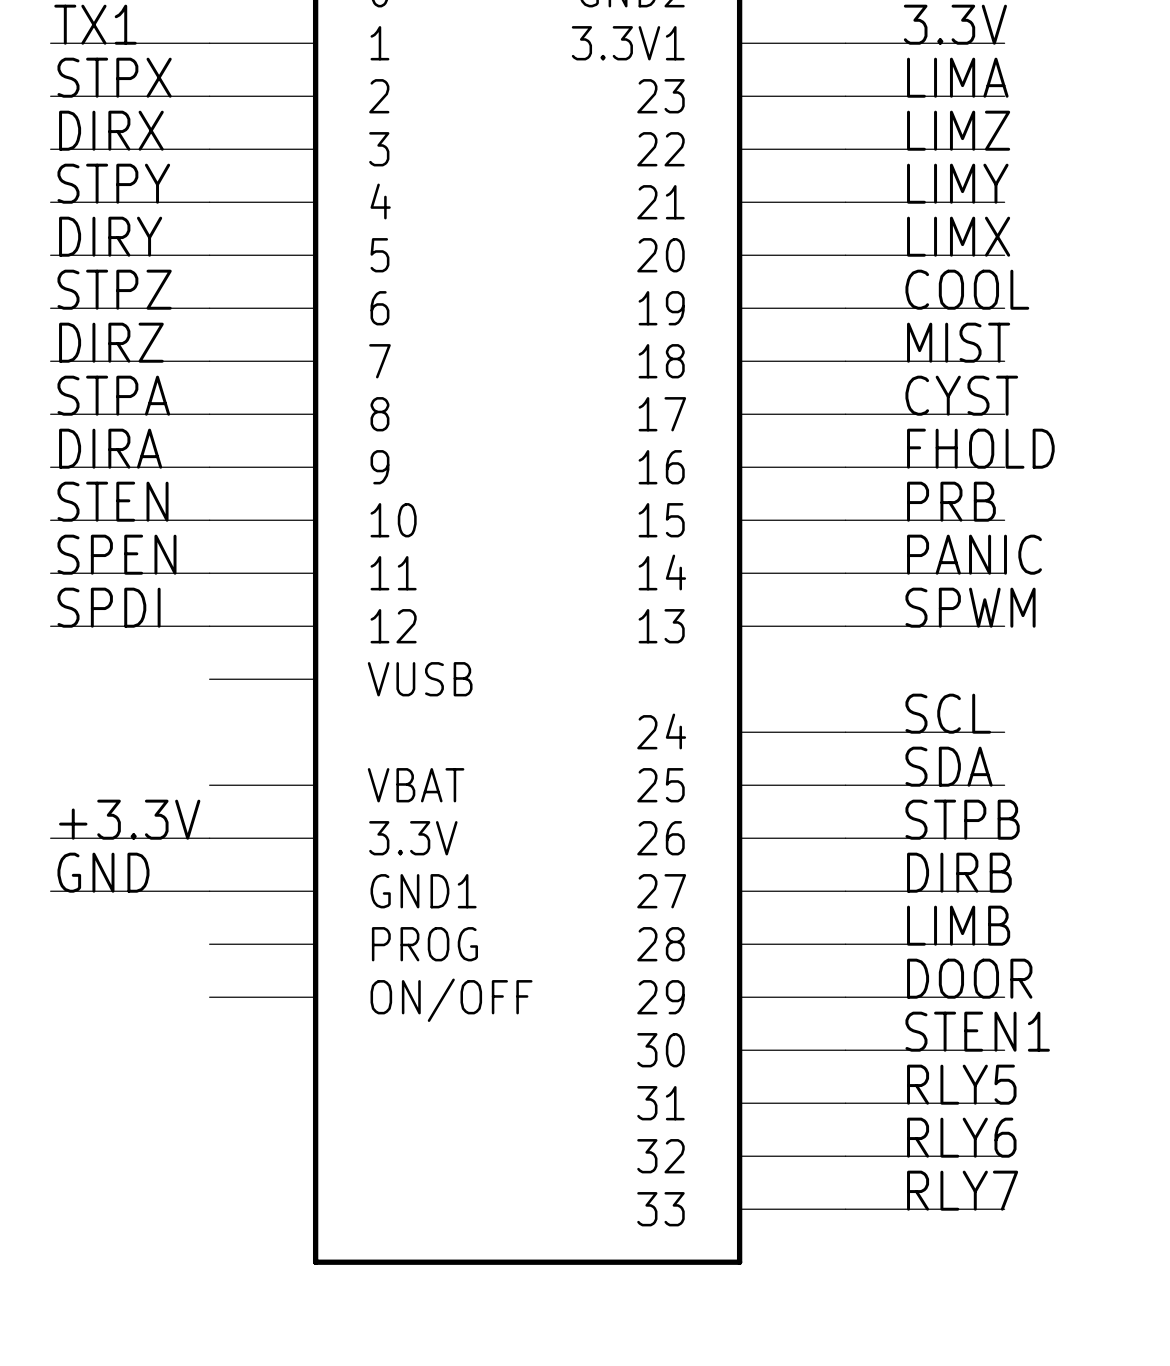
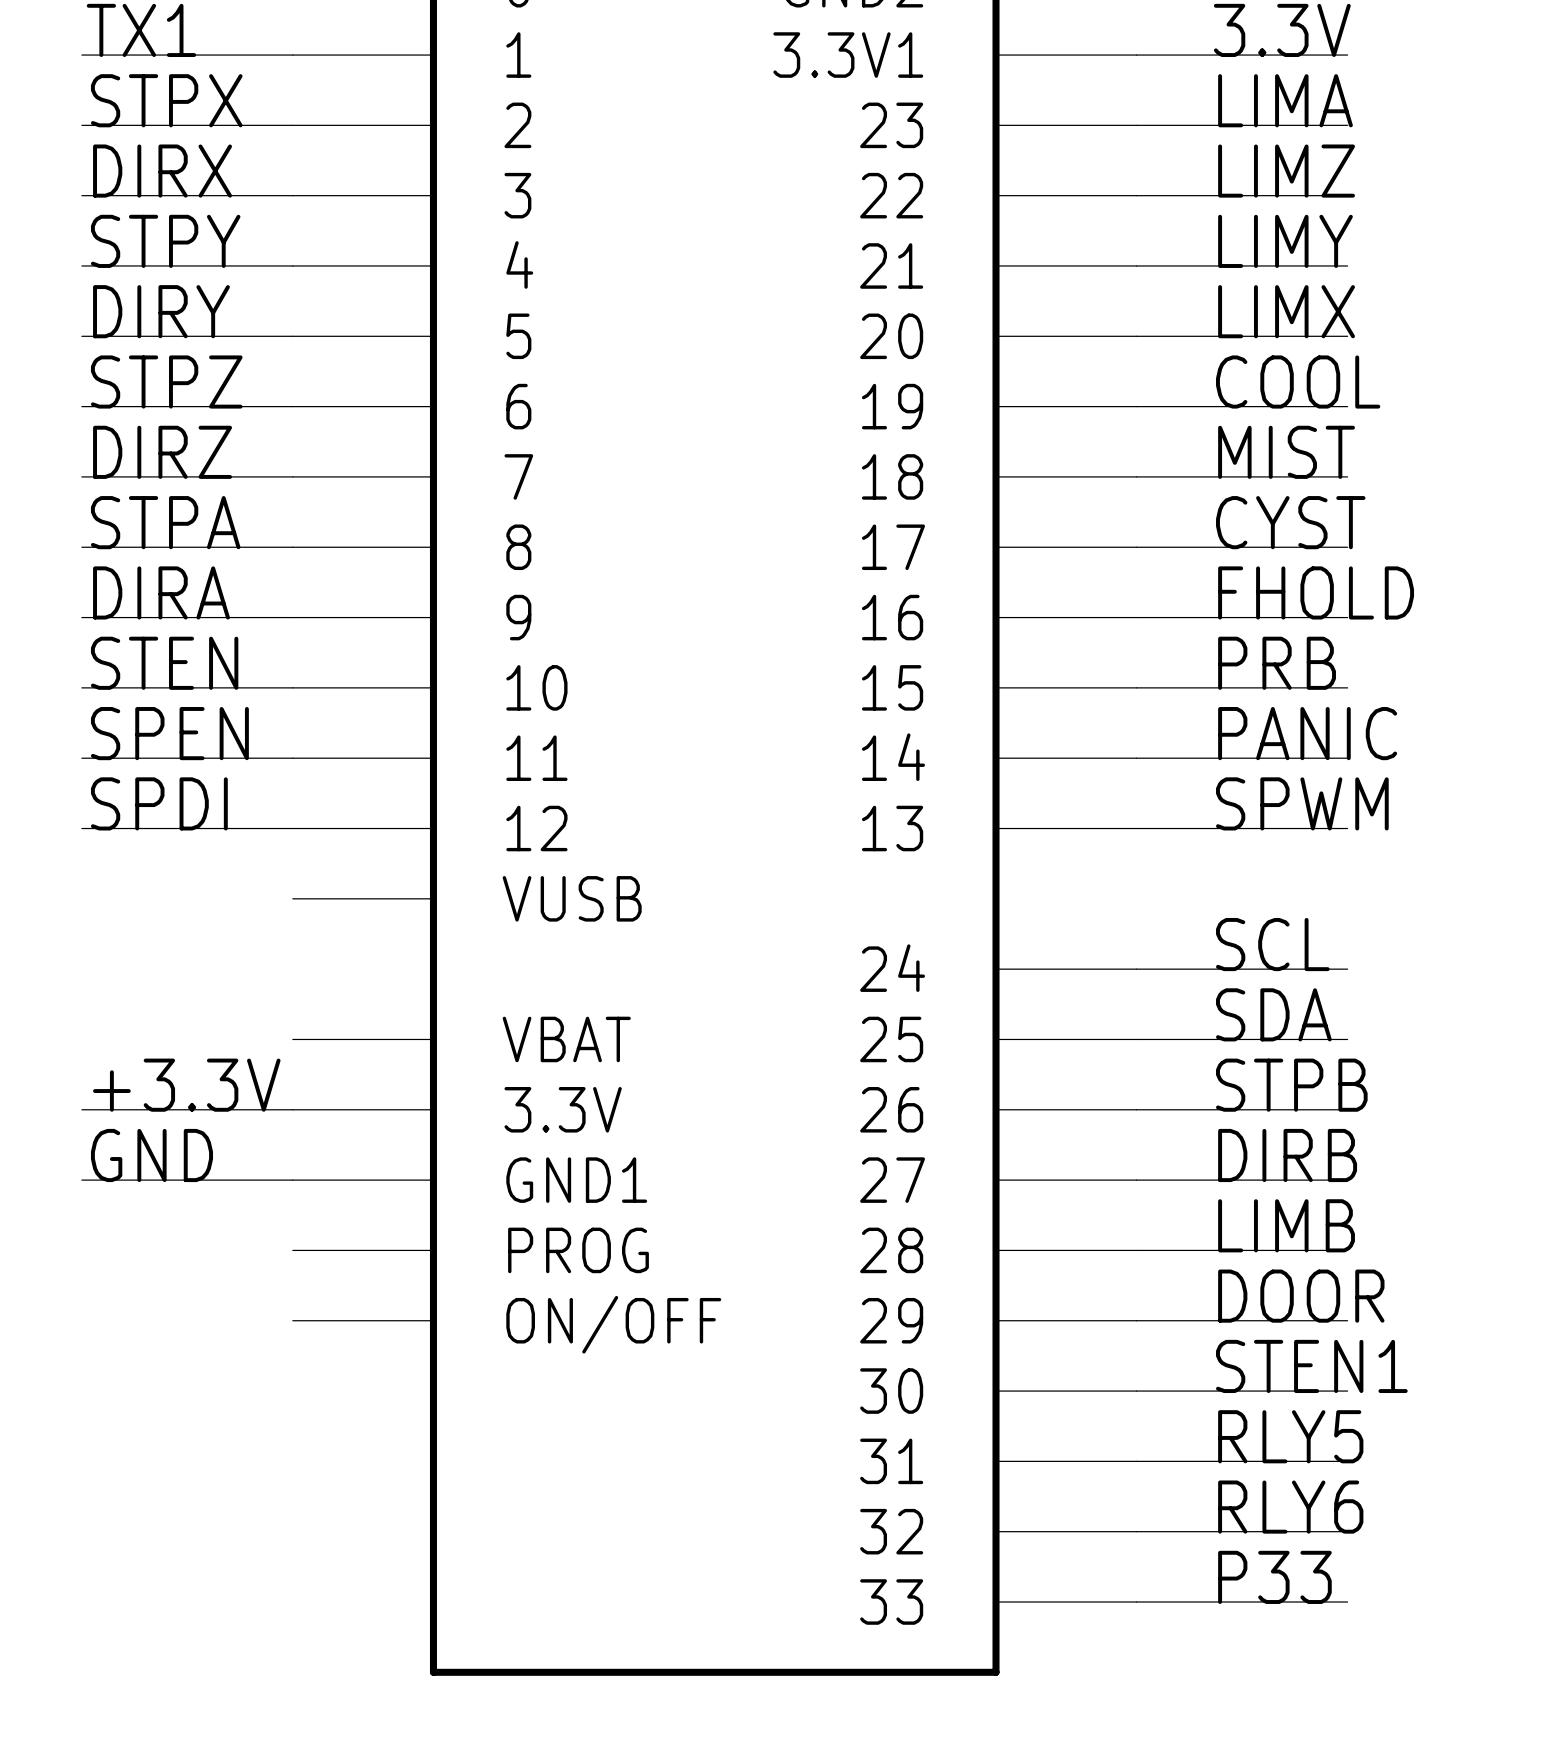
label: RLY7 (962, 1190) -> P33 (1274, 1577)

